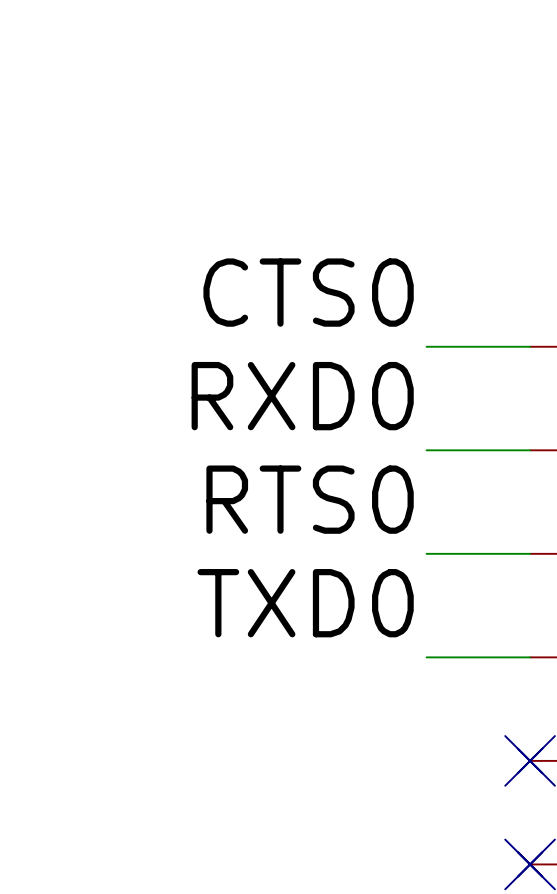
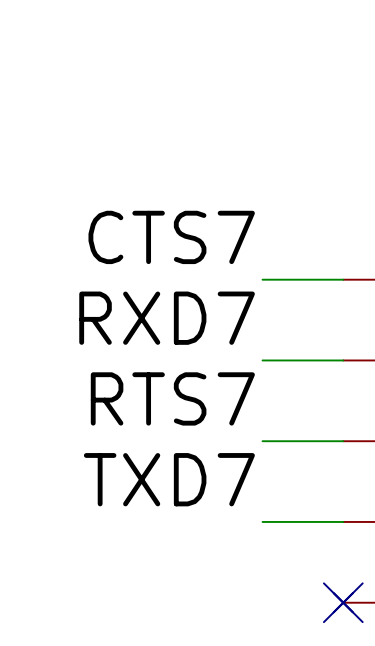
label: CTS0 (308, 292) -> CTS7 (171, 237)
label: RXD0 (302, 396) -> RXD7 (167, 318)
label: RTS0 (310, 499) -> RTS7 (172, 398)
label: TXD0 (305, 603) -> TXD7 (169, 479)

